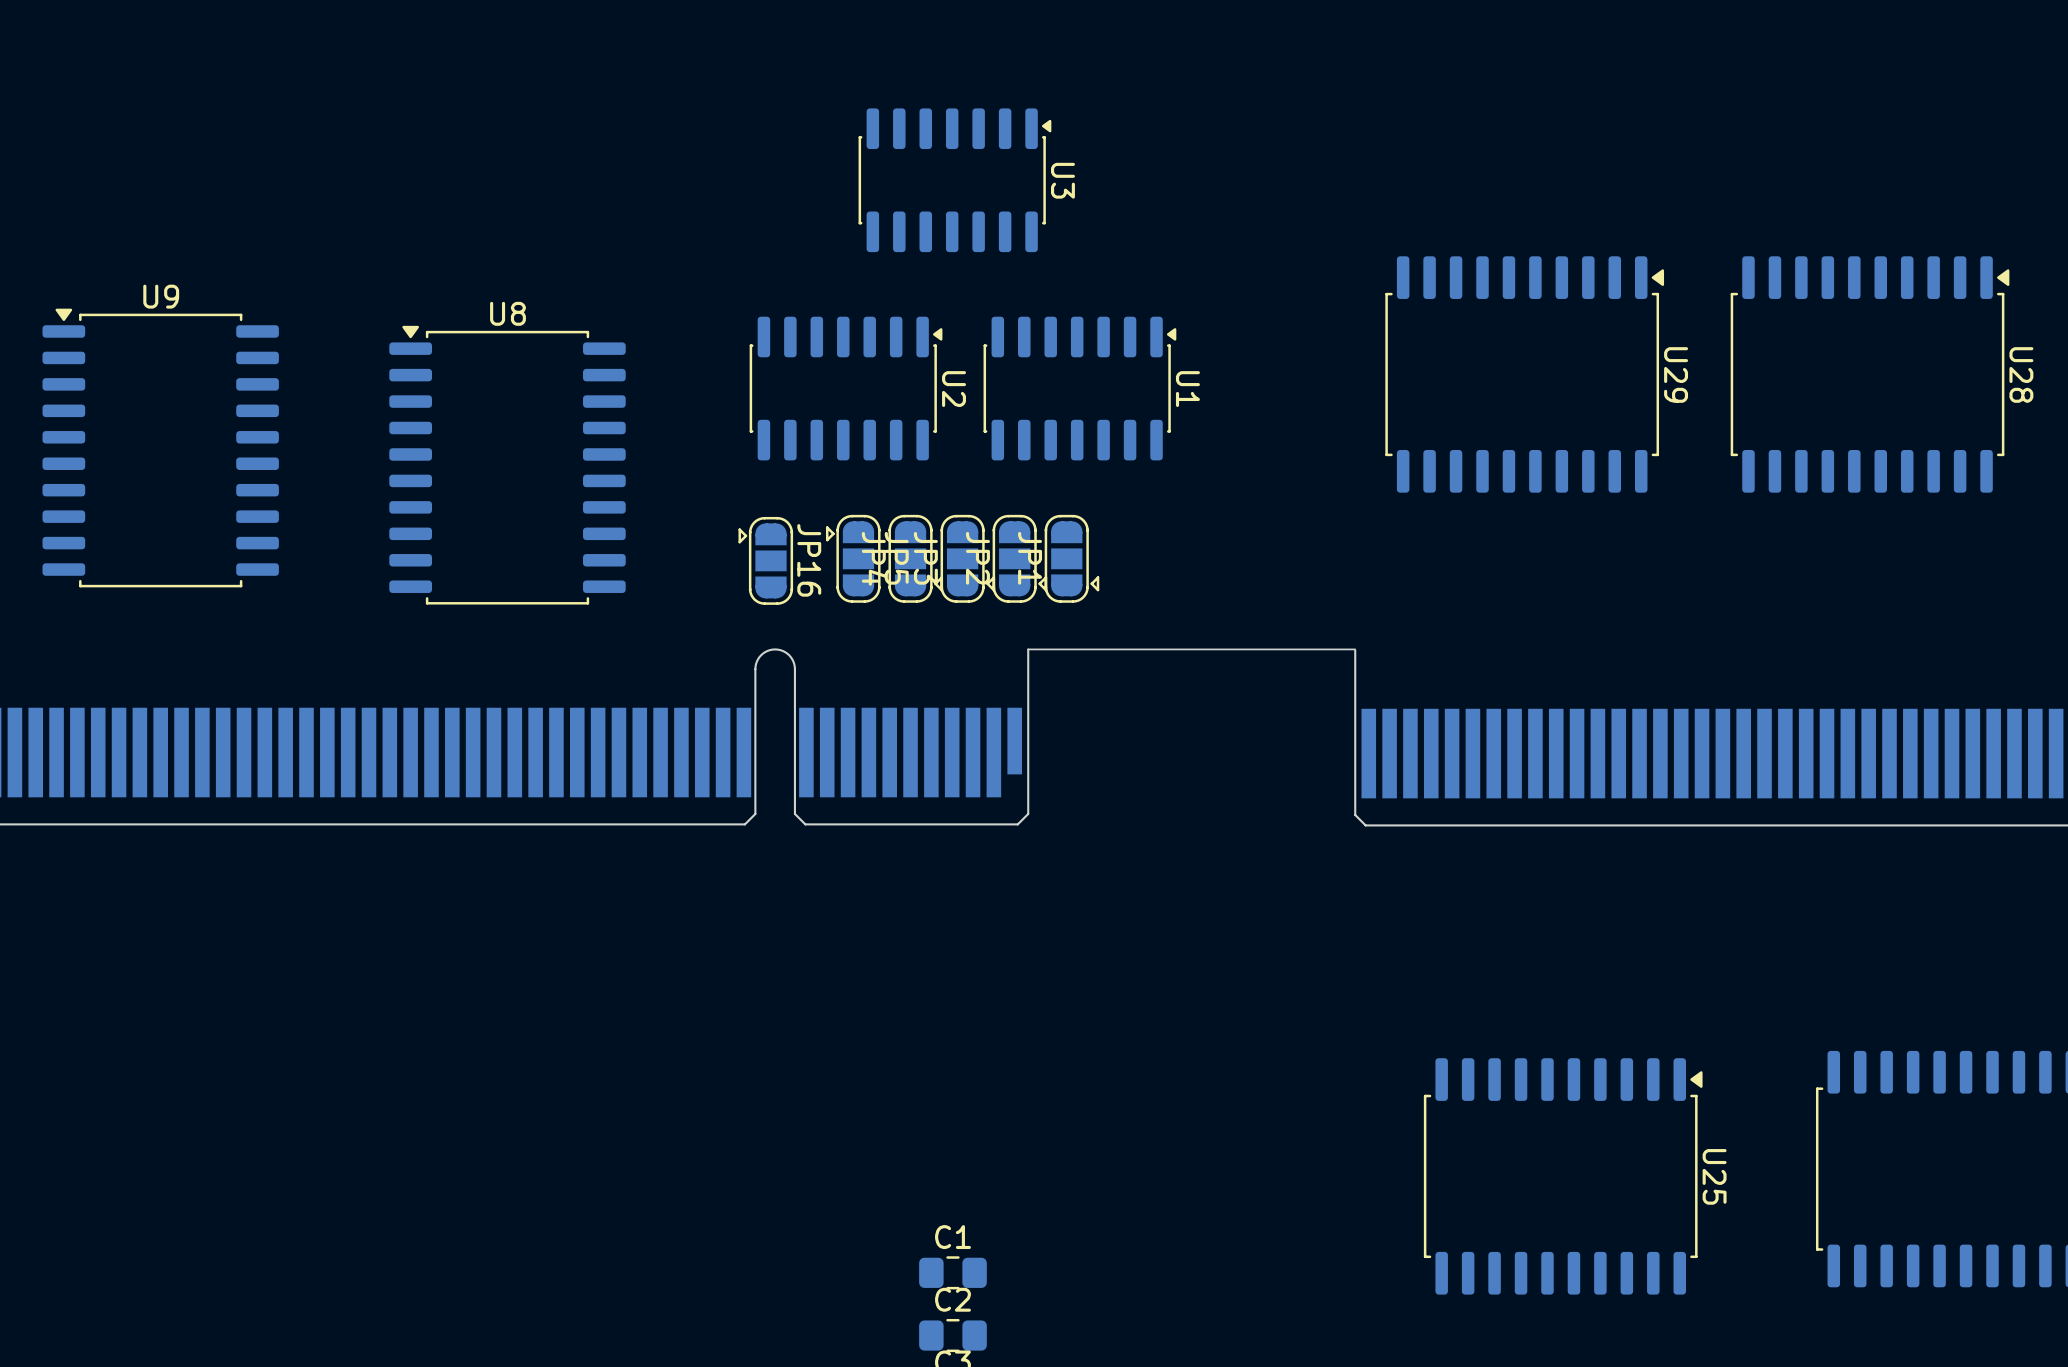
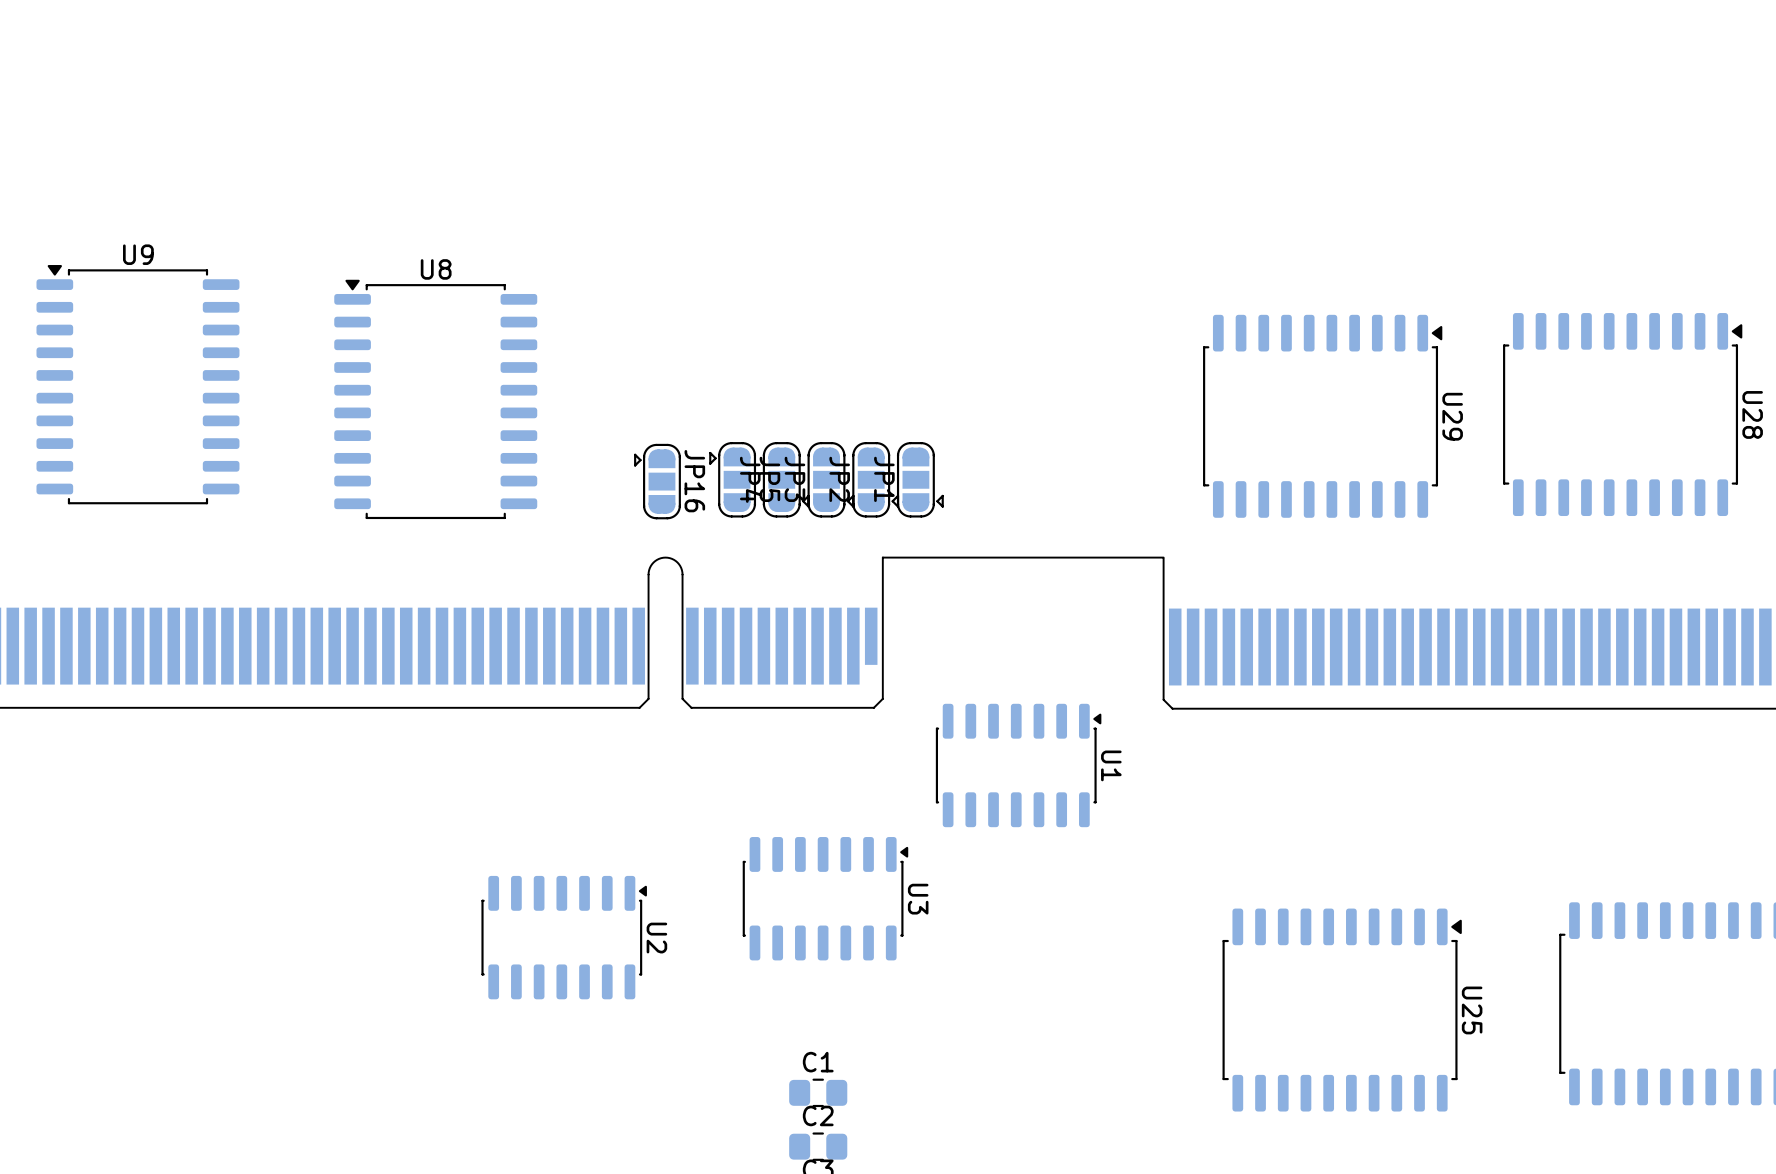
U3 position: (954, 180) -> (825, 898)
U29 position: (1524, 374) -> (1322, 416)
U28 position: (1870, 374) -> (1622, 414)
U2 position: (846, 388) -> (564, 937)
U1 position: (1079, 388) -> (1018, 765)

